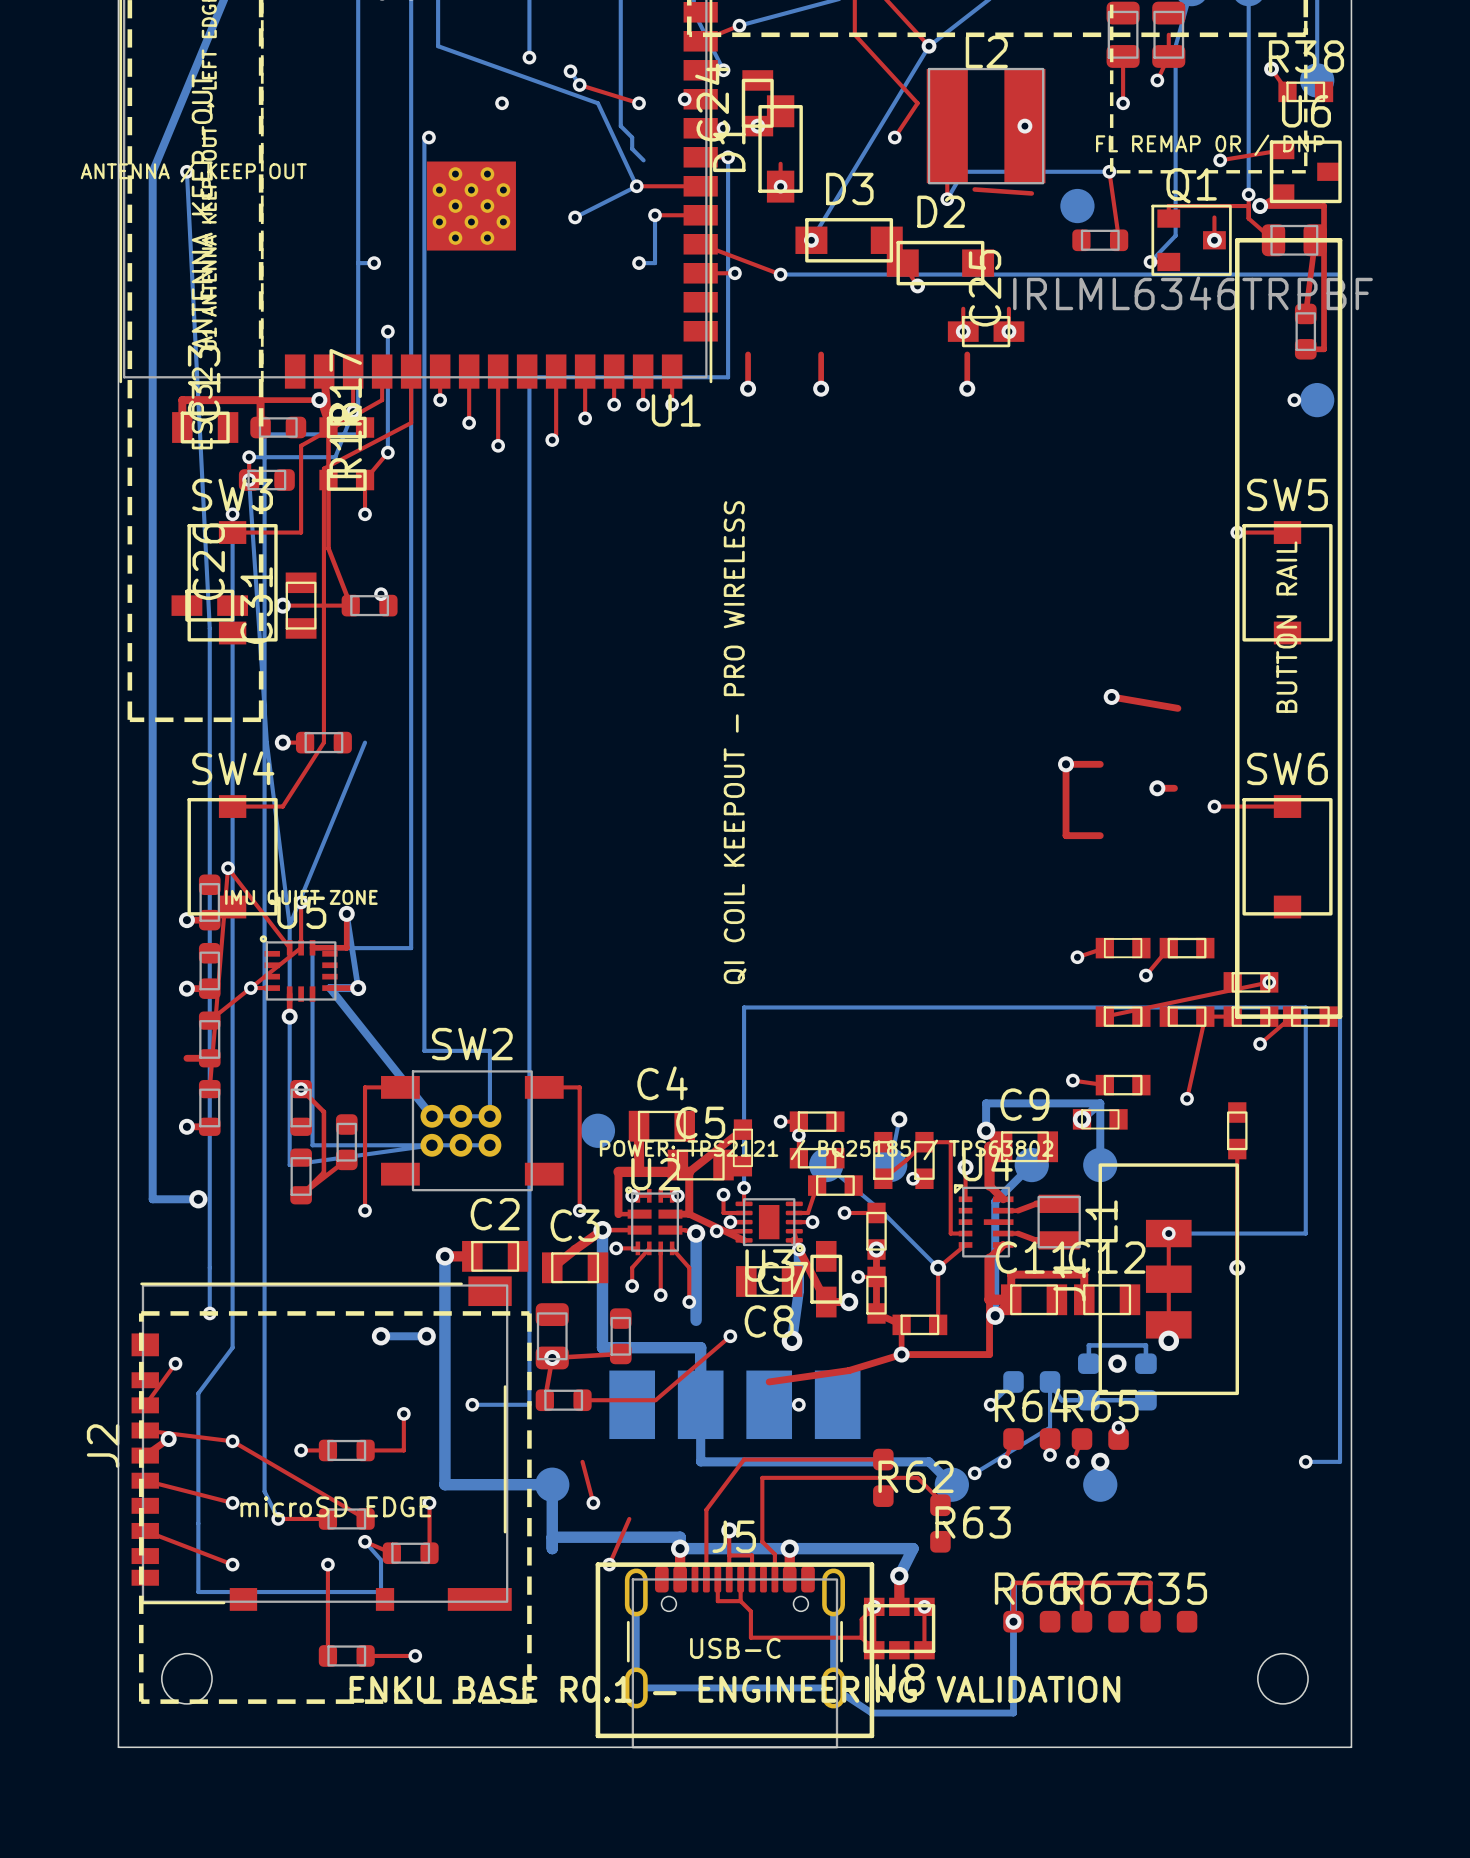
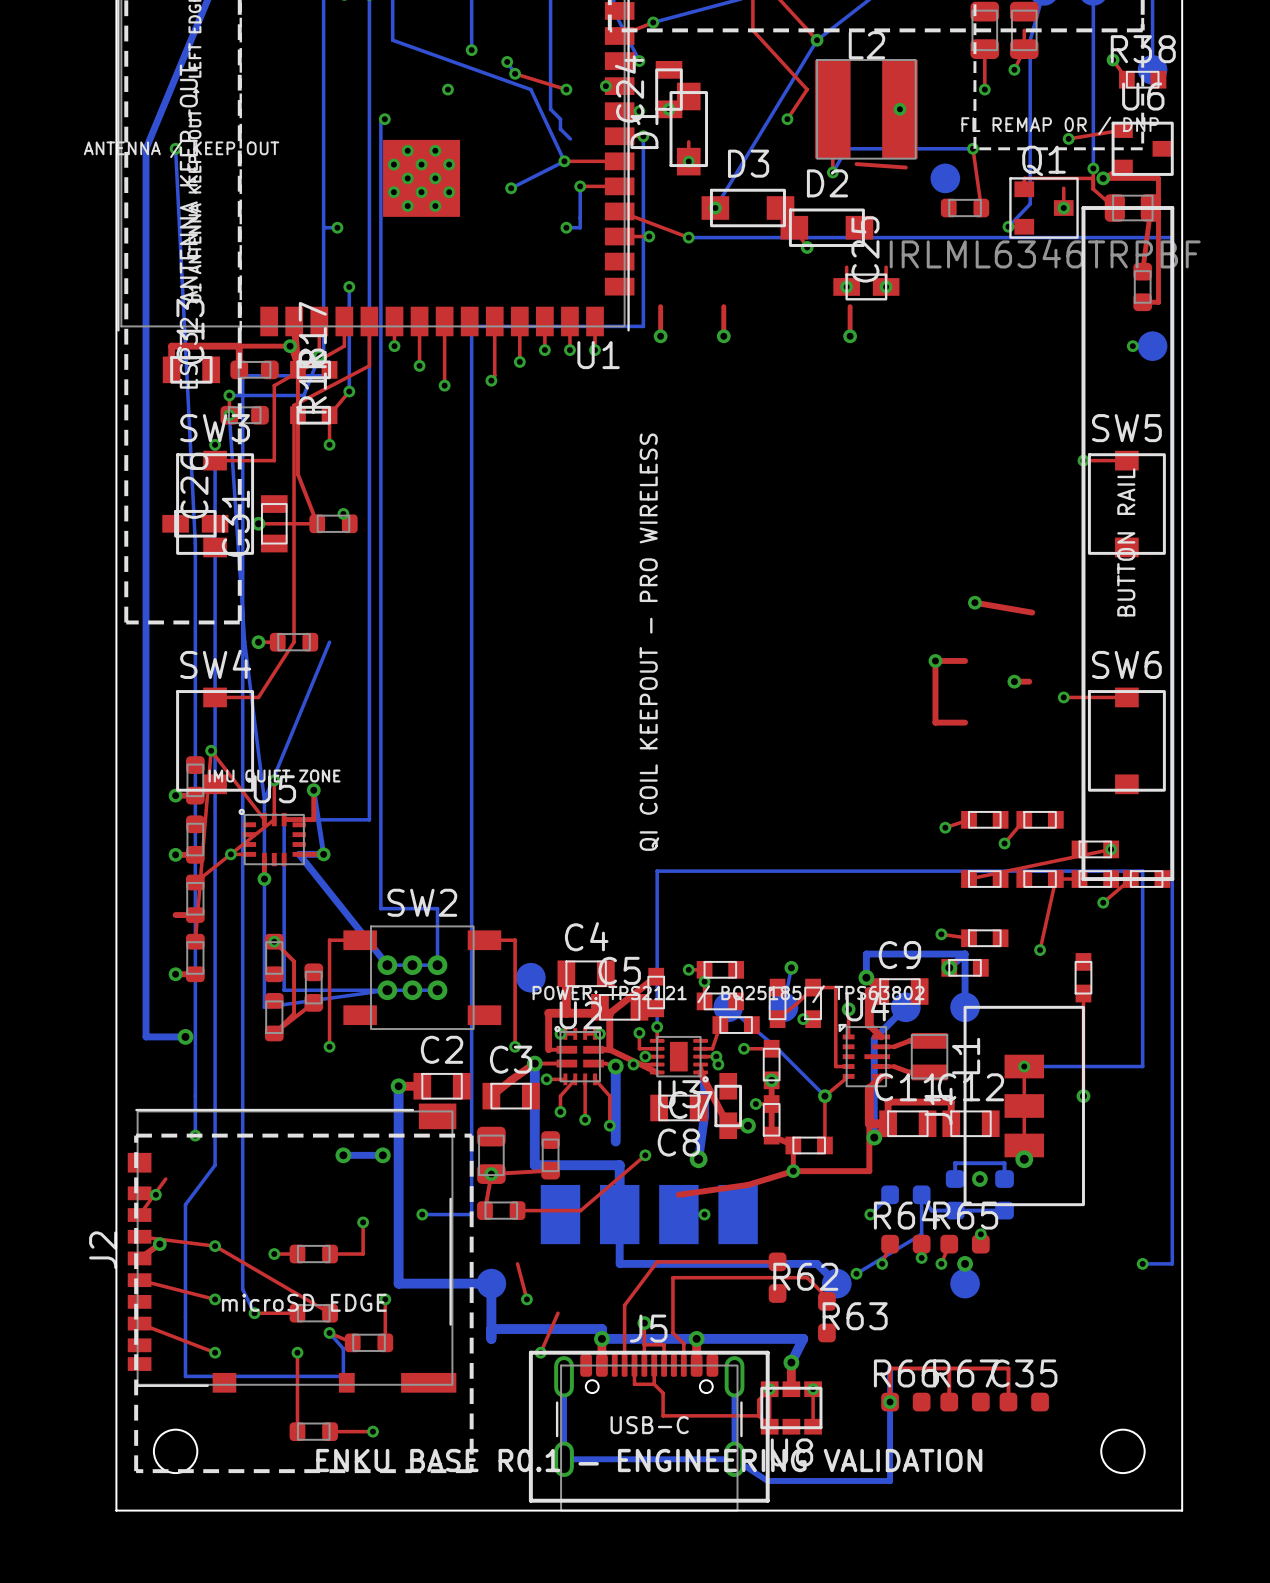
via position: (798, 1249) -> (718, 1064)
via position: (175, 1363) -> (155, 1194)

